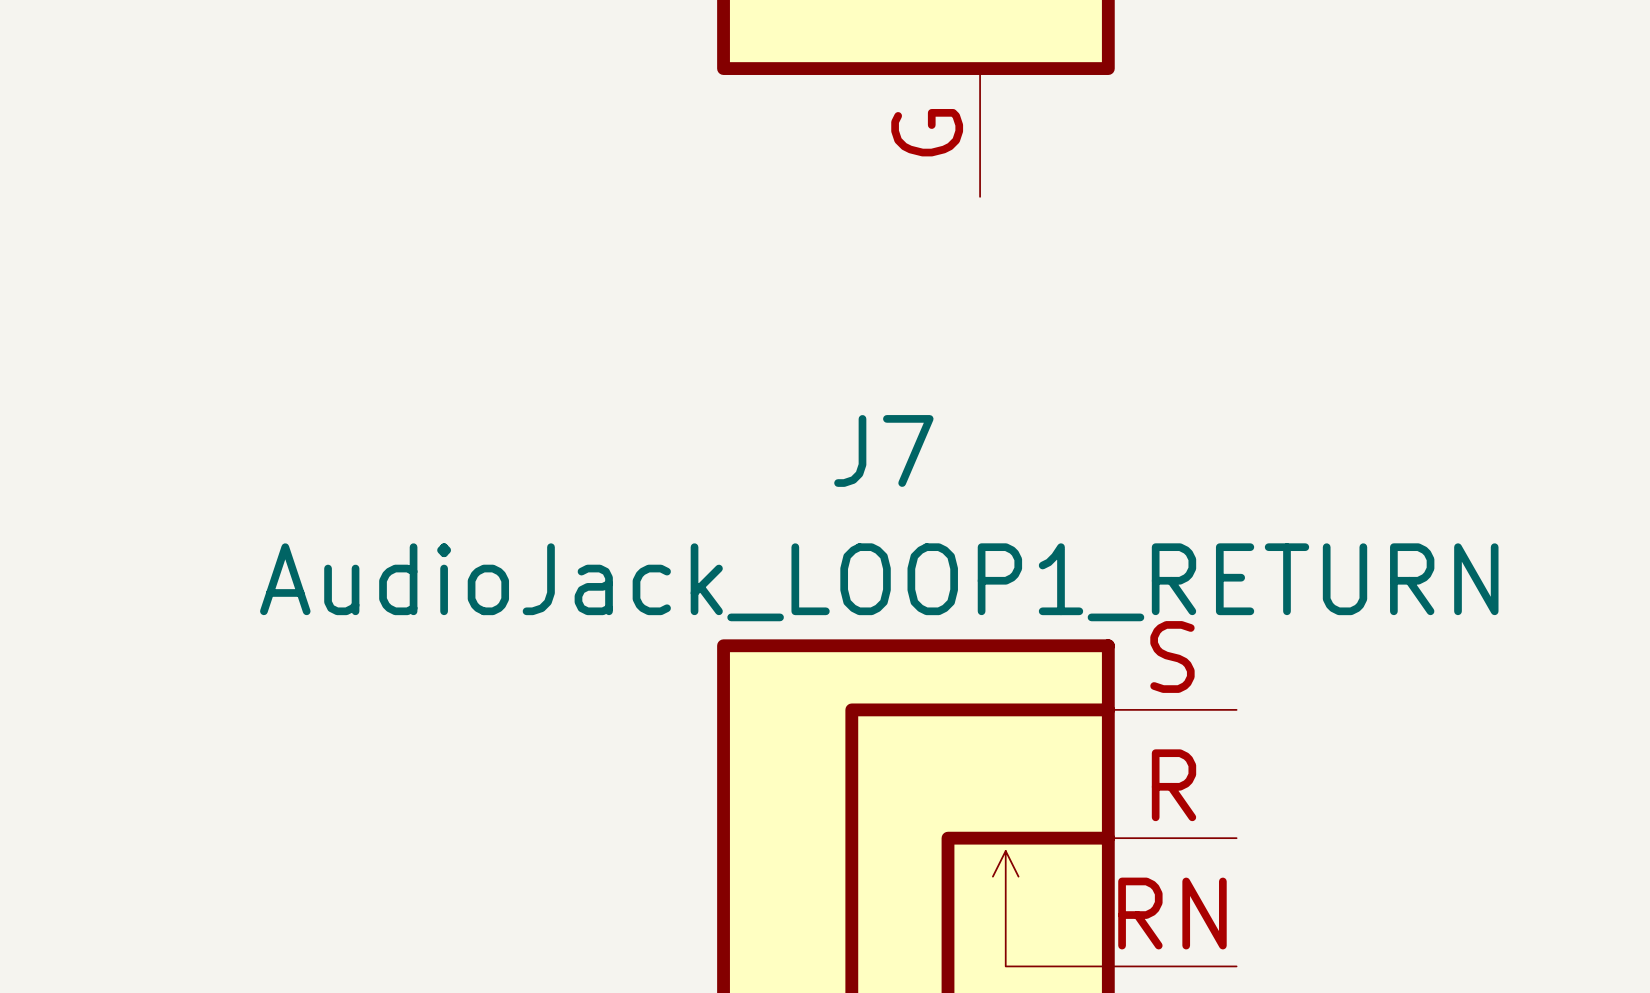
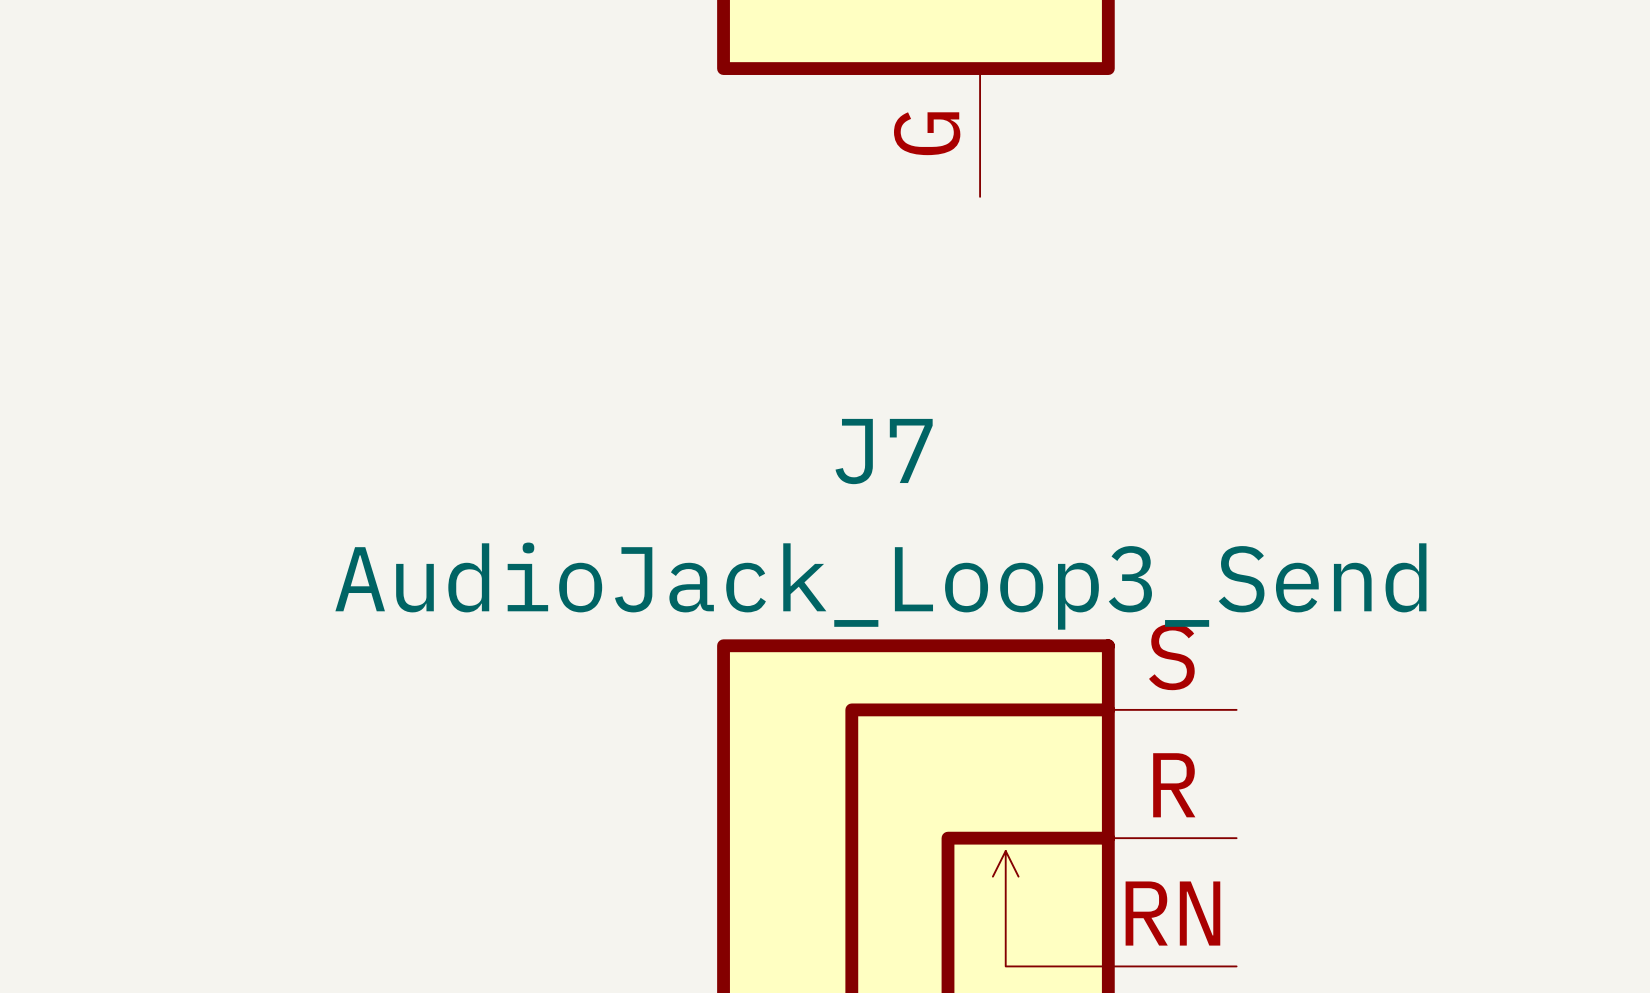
J7 value: AudioJack_LOOP1_RETURN (879, 582) -> AudioJack_Loop3_Send (880, 586)

